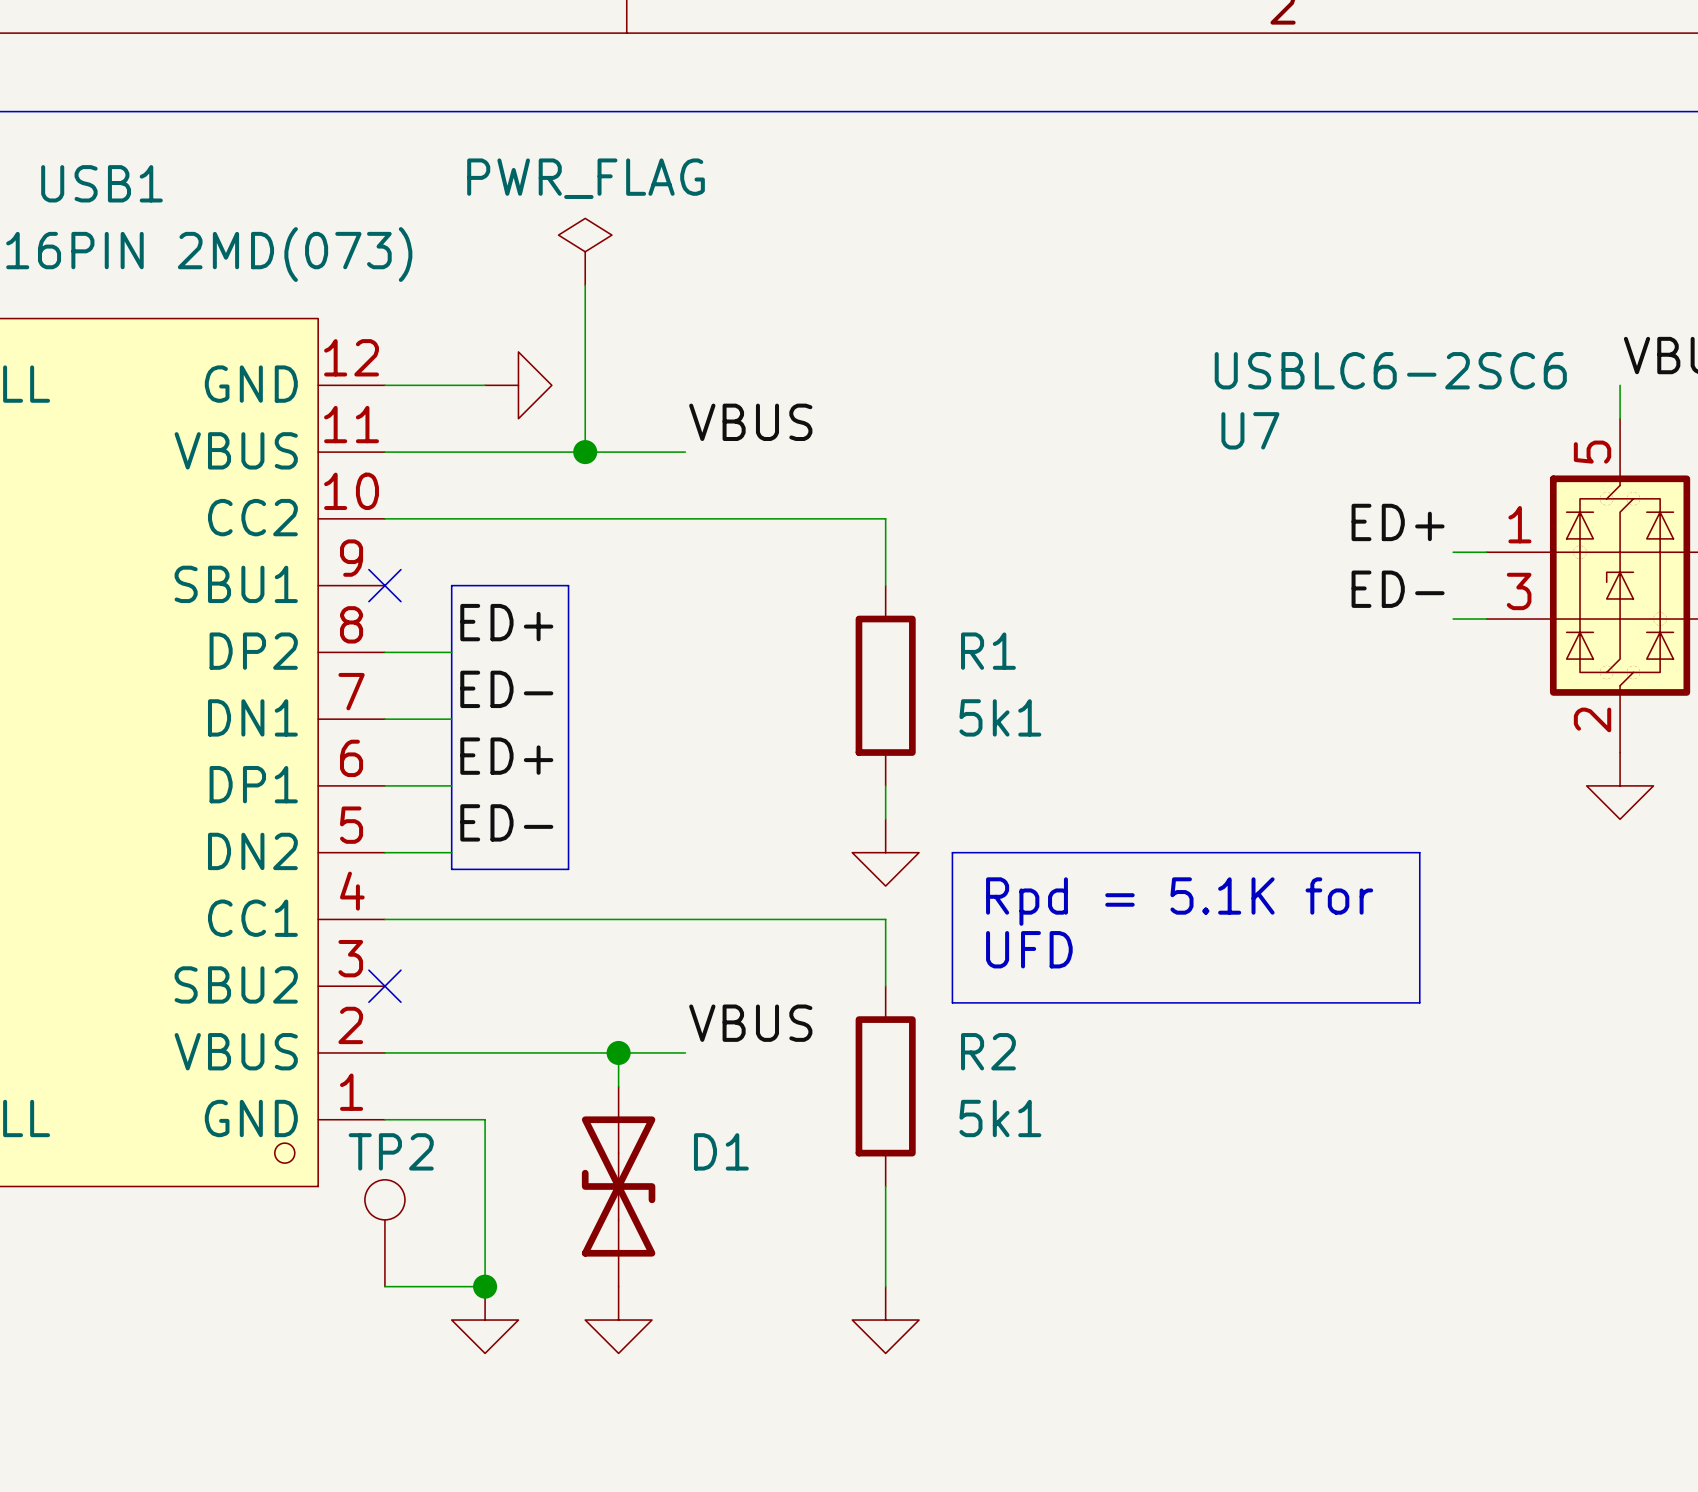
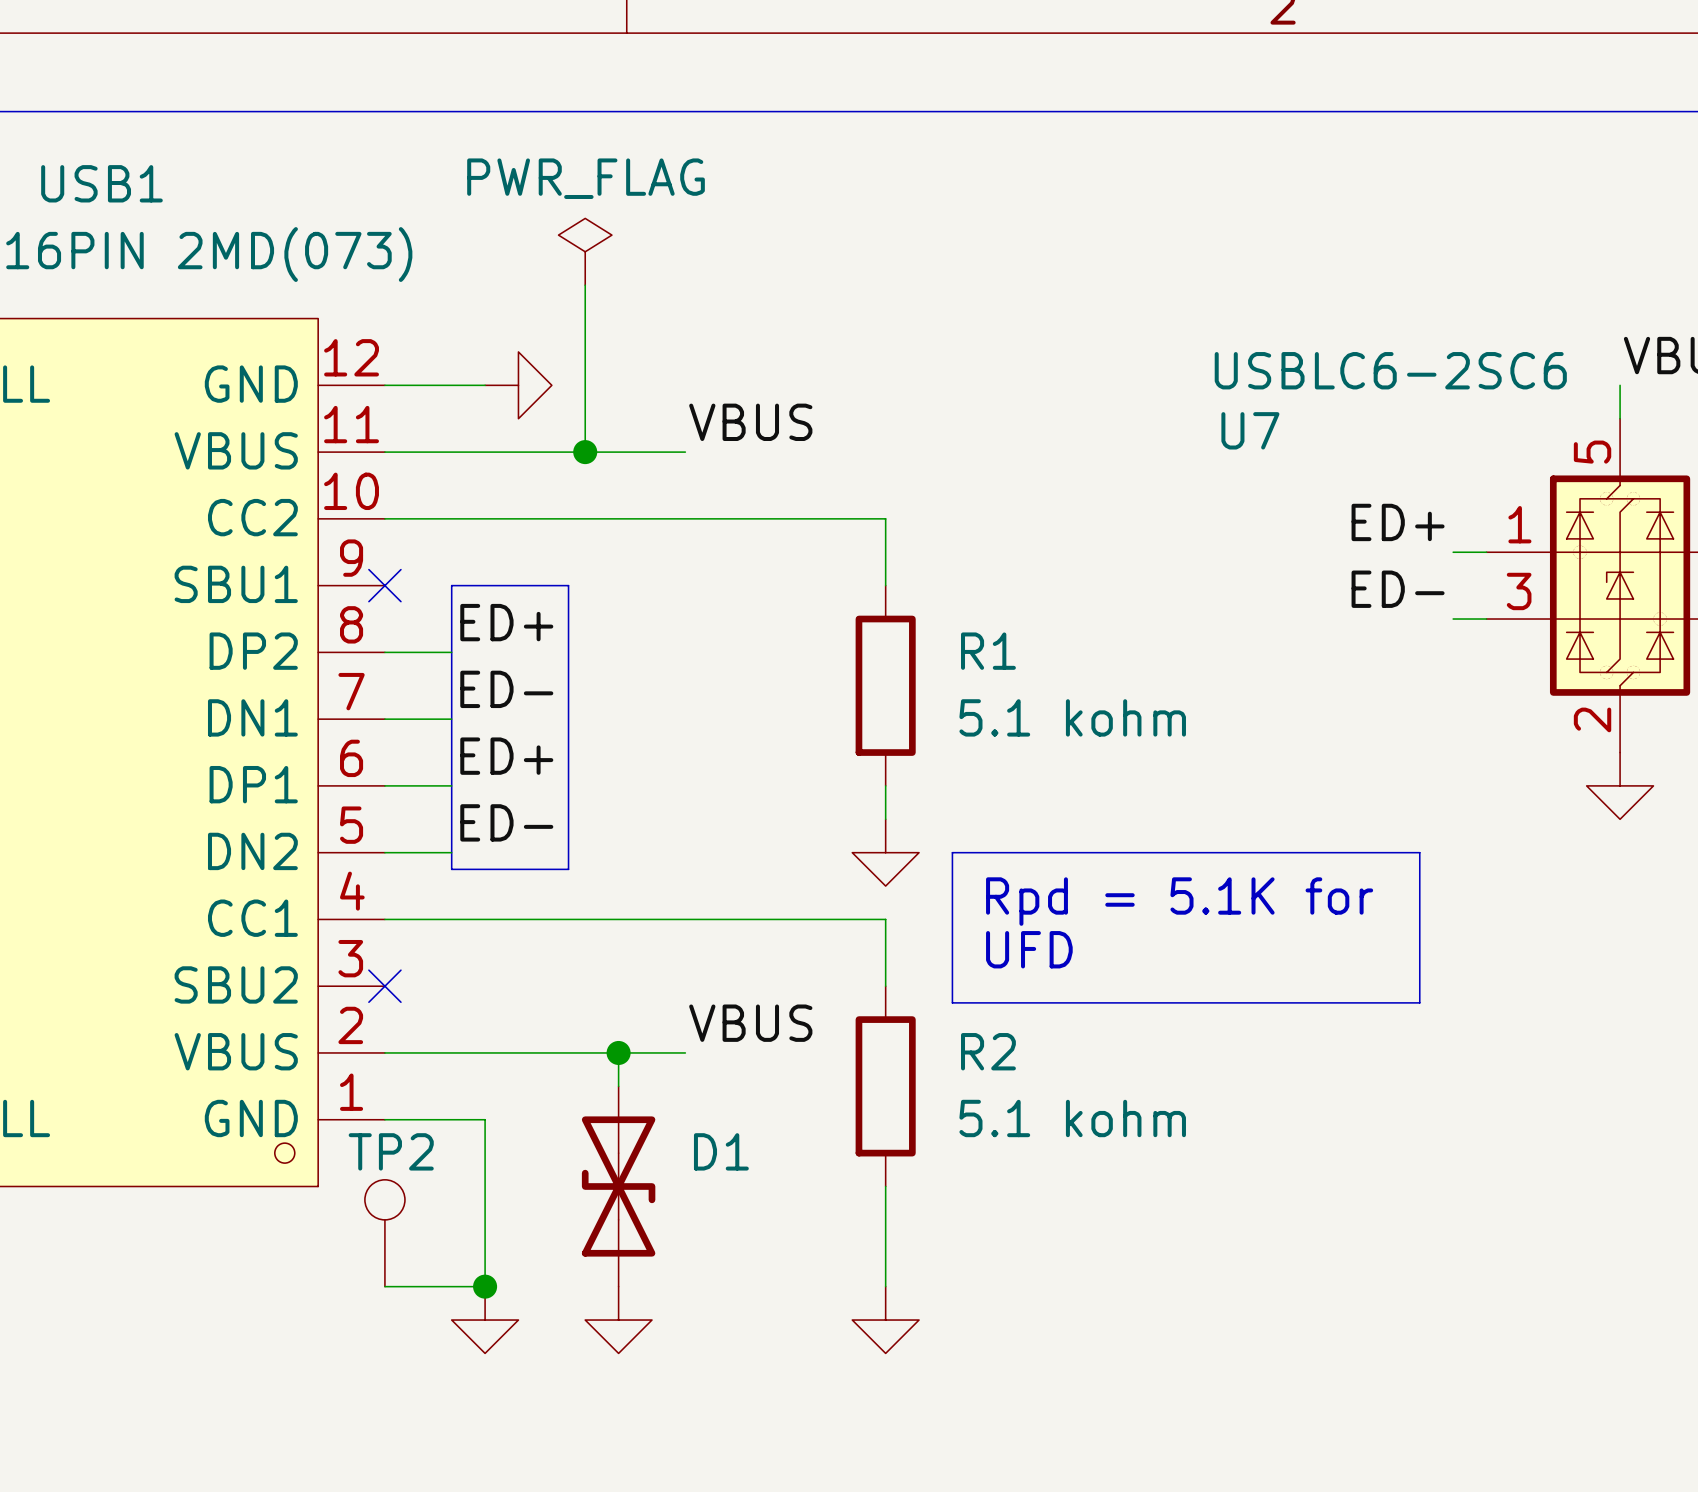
R1 value: 5k1 (1000, 717) -> 5.1 kohm (1072, 717)
R2 value: 5k1 (1000, 1118) -> 5.1 kohm (1072, 1118)

